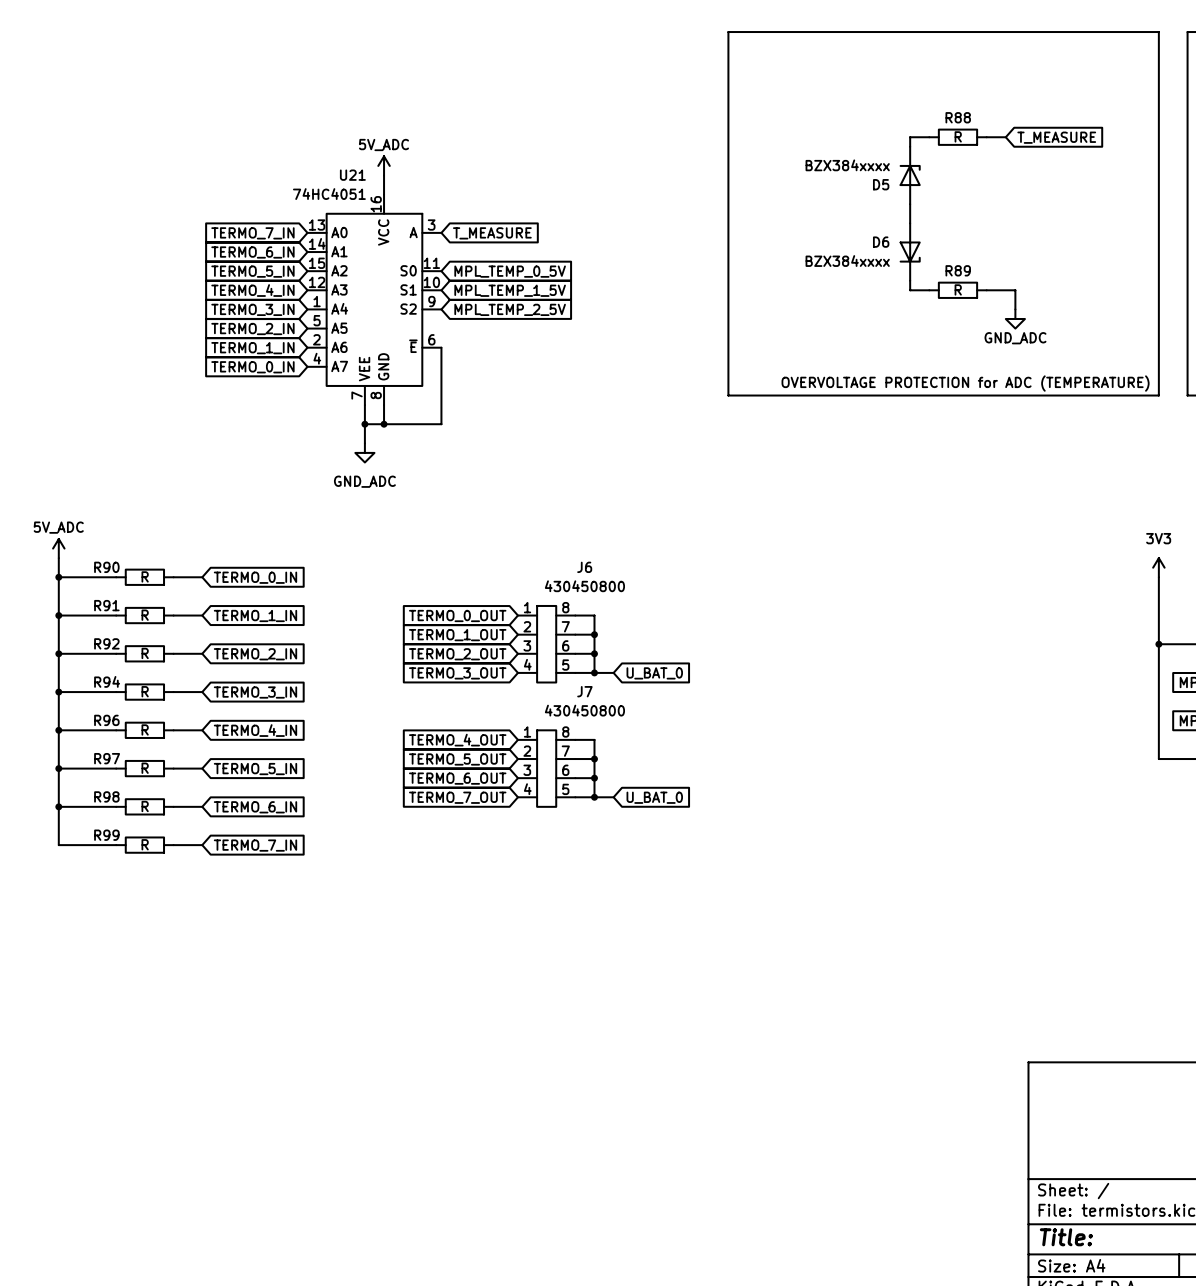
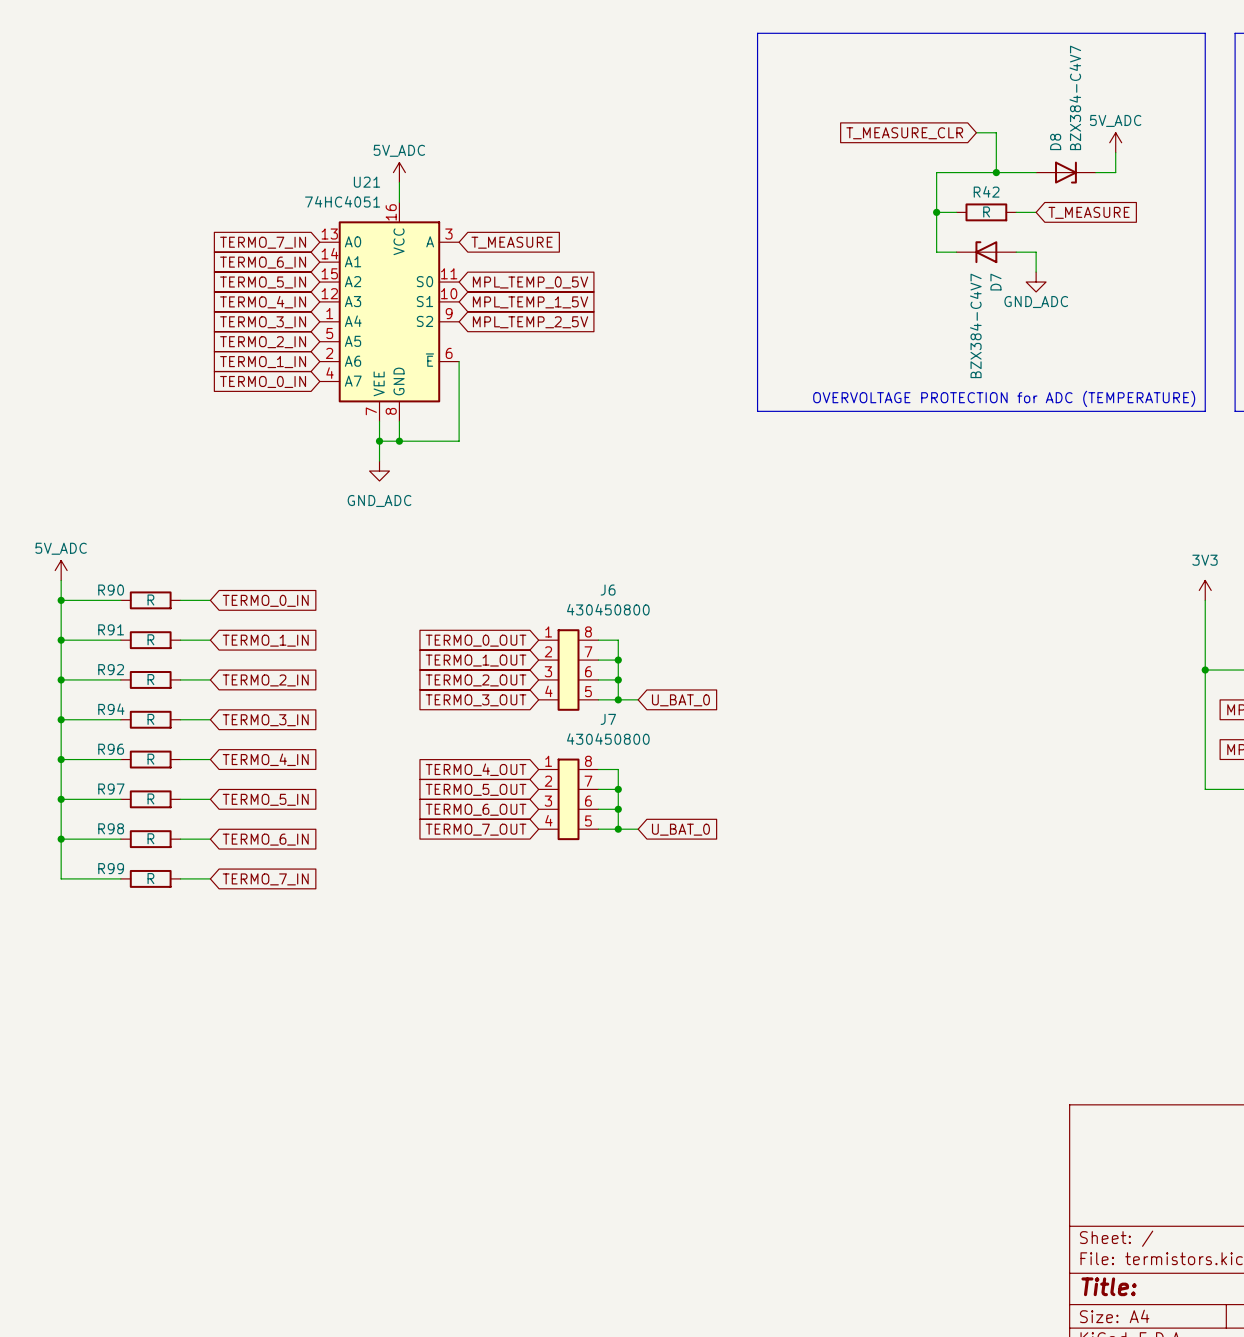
wire: none -> (976, 132) (996, 132) (996, 172)
global label: none -> T_MEASURE_CLR (904, 133)
wire: (929, 137) (910, 137) (910, 146) -> none
R88: R (957, 137) -> none
wire: (986, 137) (1005, 137) -> (1016, 212) (1036, 212)
global label position: T_MEASURE (1056, 137) -> T_MEASURE (1089, 212)
power symbol: none -> 5V_ADC (1115, 142)
wire: none -> (1115, 152) (1115, 172) (1095, 172)
junction: none -> (996, 172)
wire: none -> (1036, 172) (936, 172) (936, 252) (956, 252)
D8: none -> BZX384-C4V7 (1065, 172)
D5: BZX384xxxx (910, 175) -> none
wire: none -> (936, 212) (956, 212)
junction: none -> (936, 212)
wire: (910, 204) (910, 223) -> none
R42: none -> R (986, 212)
D7: none -> BZX384-C4V7 (986, 252)
wire: none -> (1016, 252) (1036, 252) (1036, 272)
D6: BZX384xxxx (910, 252) -> none
wire: (910, 280) (910, 290) (929, 290) -> none
R89: R (957, 290) -> none
wire: (986, 290) (1015, 290) (1015, 309) -> none
power symbol position: GND_ADC (1015, 318) -> GND_ADC (1036, 282)

